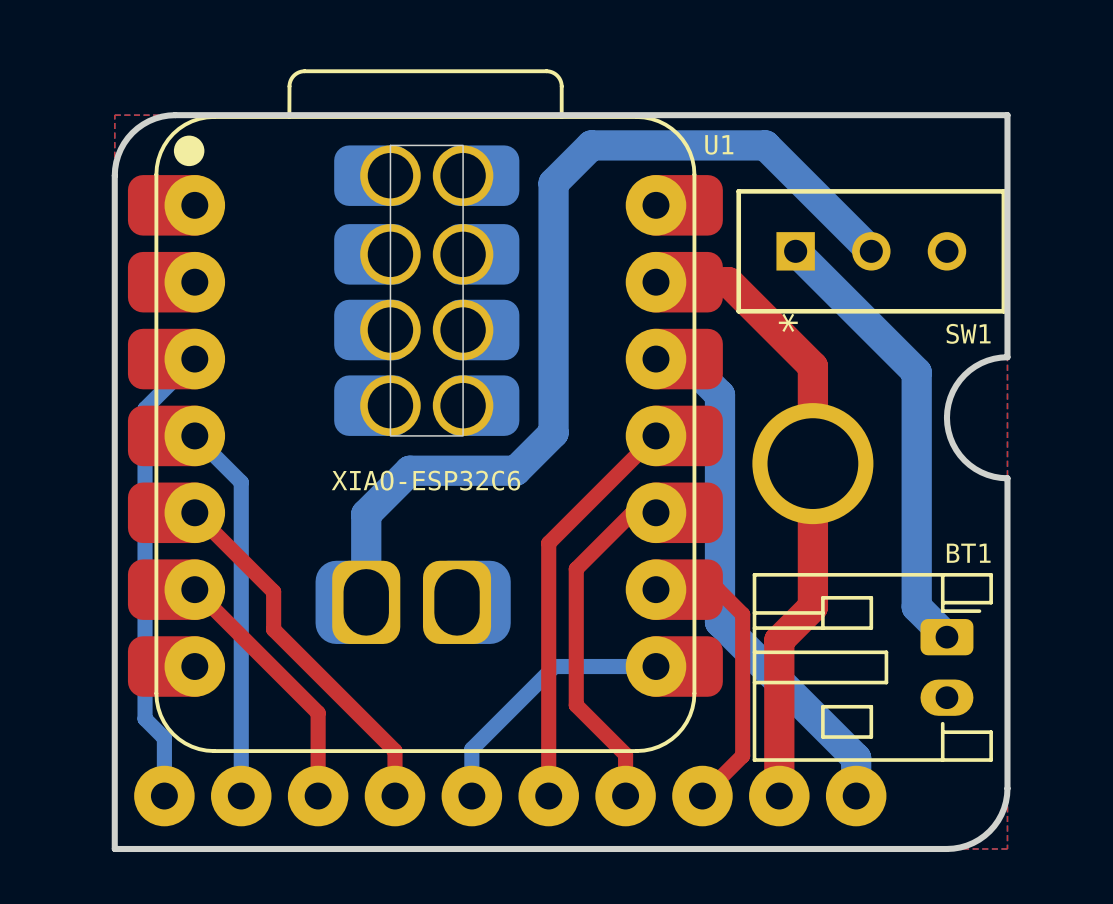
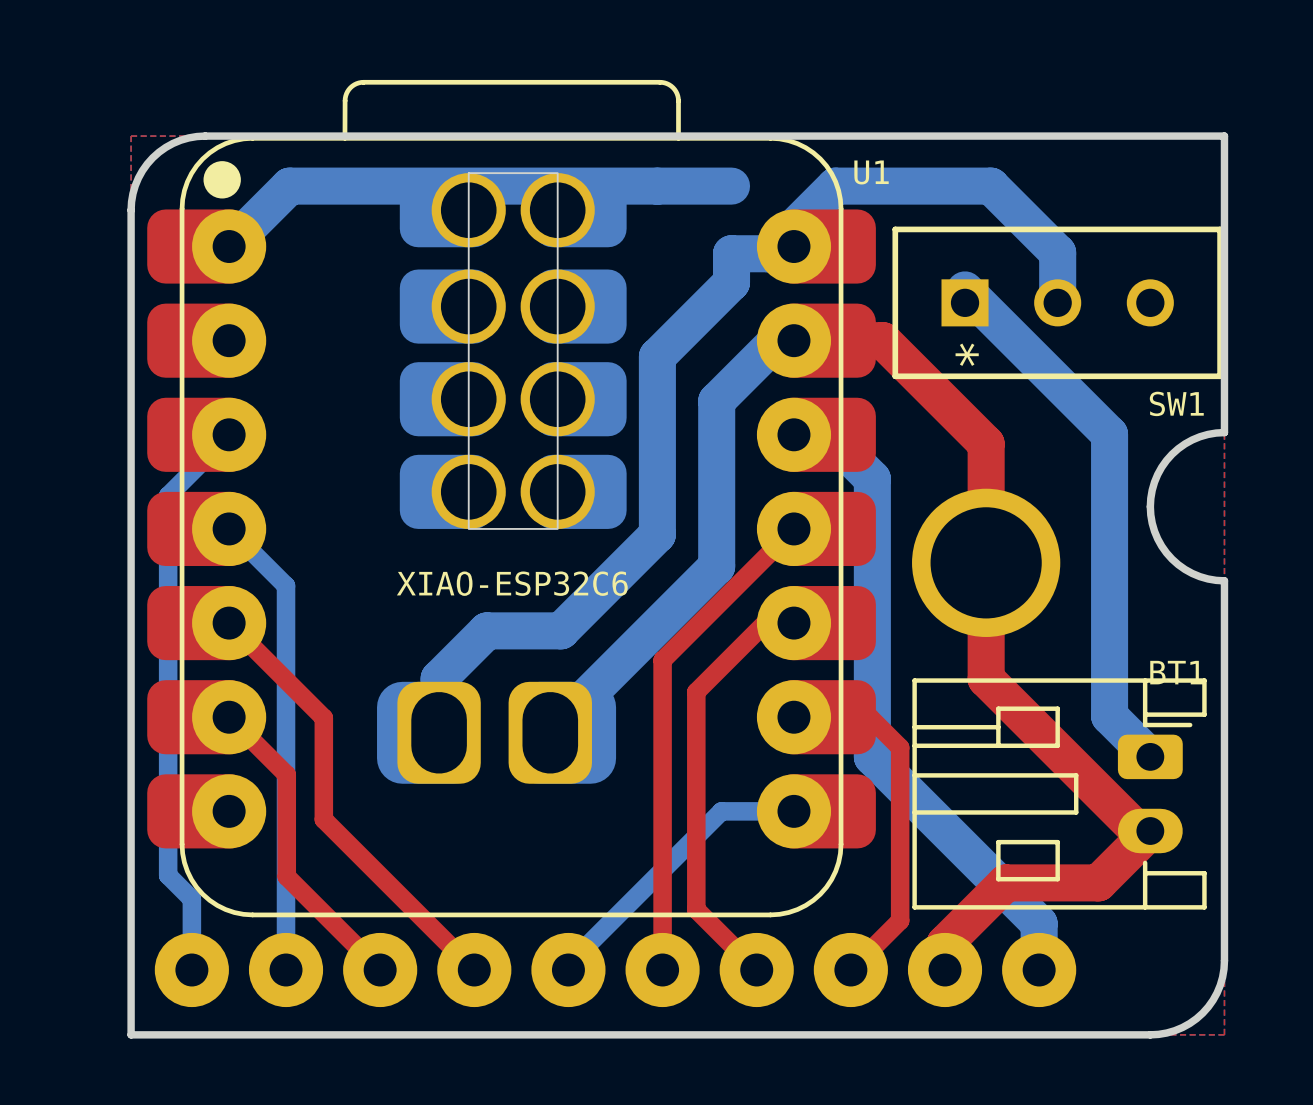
bottom track: none -> (731, 186) (289, 186) (229, 246)
bottom track: none -> (965, 289) (1109, 434) (1109, 716) (1150, 756)
bottom track: (795, 251) (916, 372) (916, 606) (946, 637) -> none
bottom track: (871, 251) (765, 145) (591, 145) (553, 183) (553, 432) (515, 470) (409, 470) (366, 514) (366, 558) -> (1057, 289) (1057, 252) (990, 186) (835, 186) (767, 253) (731, 253) (731, 282) (657, 356) (657, 534) (561, 630) (486, 630) (439, 678)
bottom track: none -> (793, 340) (777, 340) (716, 401) (716, 566) (550, 732)
SW1 text position: * (788, 322) -> * (967, 354)
top track: (812, 558) (812, 606) (779, 640) (779, 774) -> (986, 678) (1138, 831) (1150, 831) (1098, 882) (1005, 882) (945, 943)
top track: (272, 590) (273, 629) (394, 750) (394, 796) -> (323, 717) (323, 819) (474, 970)
top track: (241, 636) (318, 712) (318, 796) -> (286, 774) (286, 876) (380, 970)
bottom track: (596, 666) (554, 666) (471, 749) (471, 791) -> (721, 811) (568, 964)
BT1 position: (872, 667) -> (1059, 793)
top track: (576, 705) (625, 754) (625, 796) -> (696, 858) (696, 909) (756, 970)

